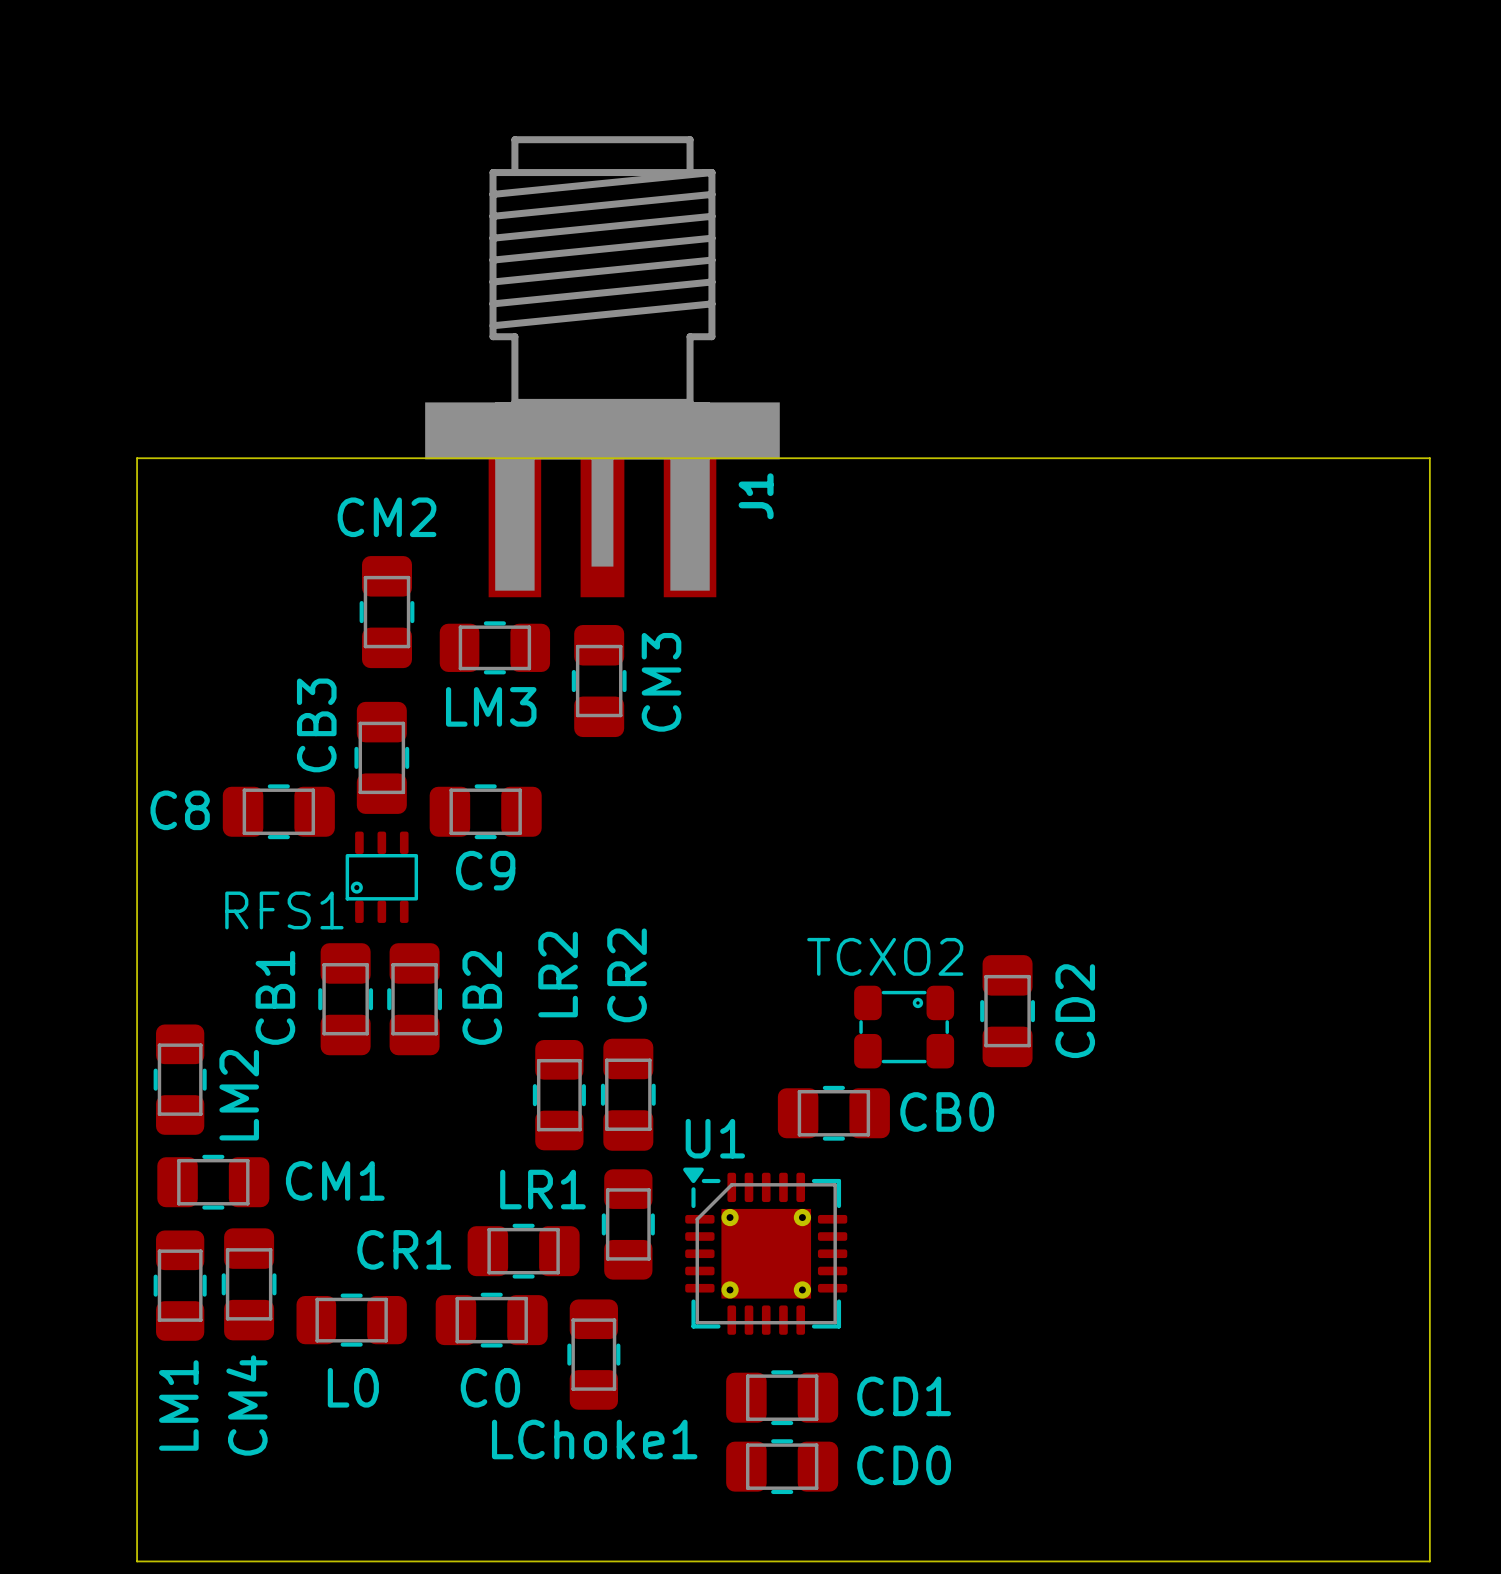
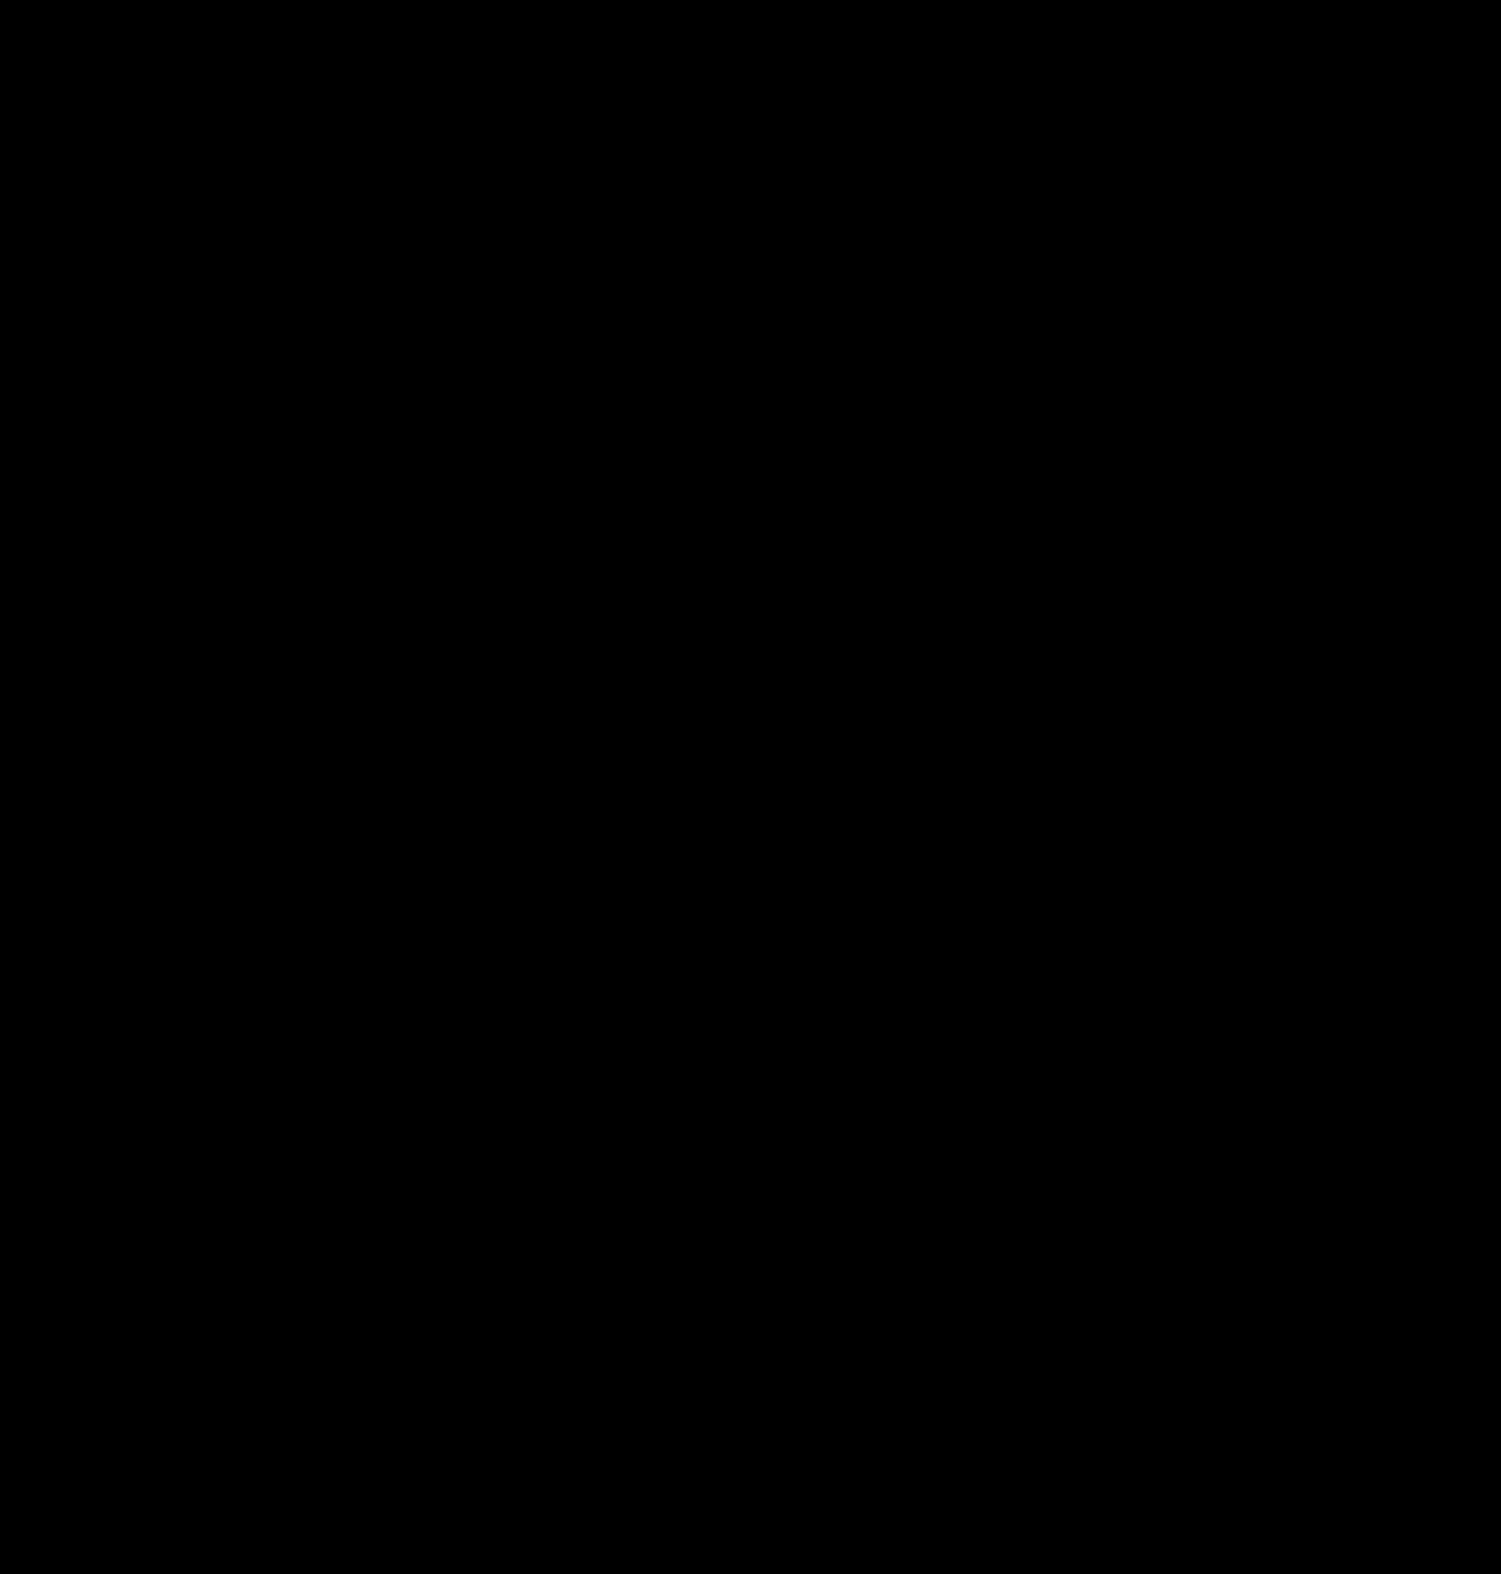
J1: (602, 366) -> none
board edge: (137, 458) (1429, 458) (1429, 1561) (137, 1561) (137, 458) -> none
CM2: (387, 612) -> none
LM3: (494, 647) -> none
CM3: (599, 681) -> none
CB3: (381, 757) -> none
C8: (278, 811) -> none
C9: (485, 811) -> none
RFS1: (381, 877) -> none
CB1: (345, 999) -> none
CB2: (414, 999) -> none
CD2: (1007, 1011) -> none
TCXO2: (904, 1027) -> none
LM2: (180, 1079) -> none
CR2: (628, 1094) -> none
LR2: (559, 1095) -> none
CB0: (833, 1113) -> none
CM1: (213, 1182) -> none
LR1: (628, 1224) -> none
CR1: (523, 1251) -> none
U1: (765, 1251) -> none
CM4: (249, 1284) -> none
LM1: (180, 1285) -> none
L0: (351, 1320) -> none
C0: (491, 1320) -> none
LChoke1: (593, 1354) -> none
CD1: (782, 1397) -> none
CD0: (782, 1466) -> none

